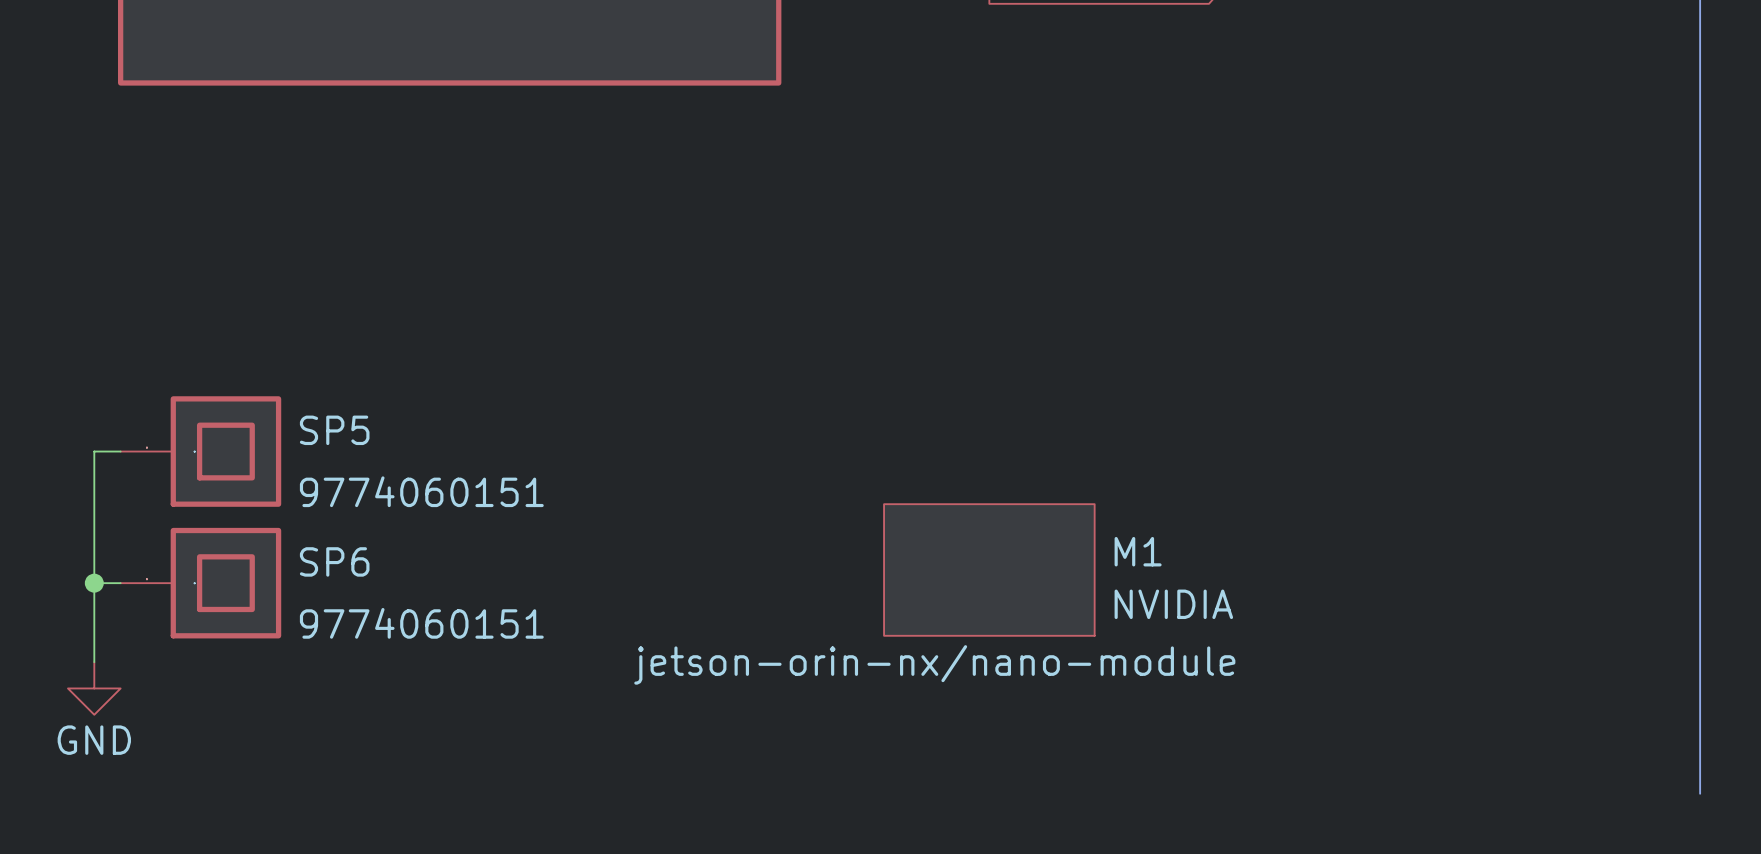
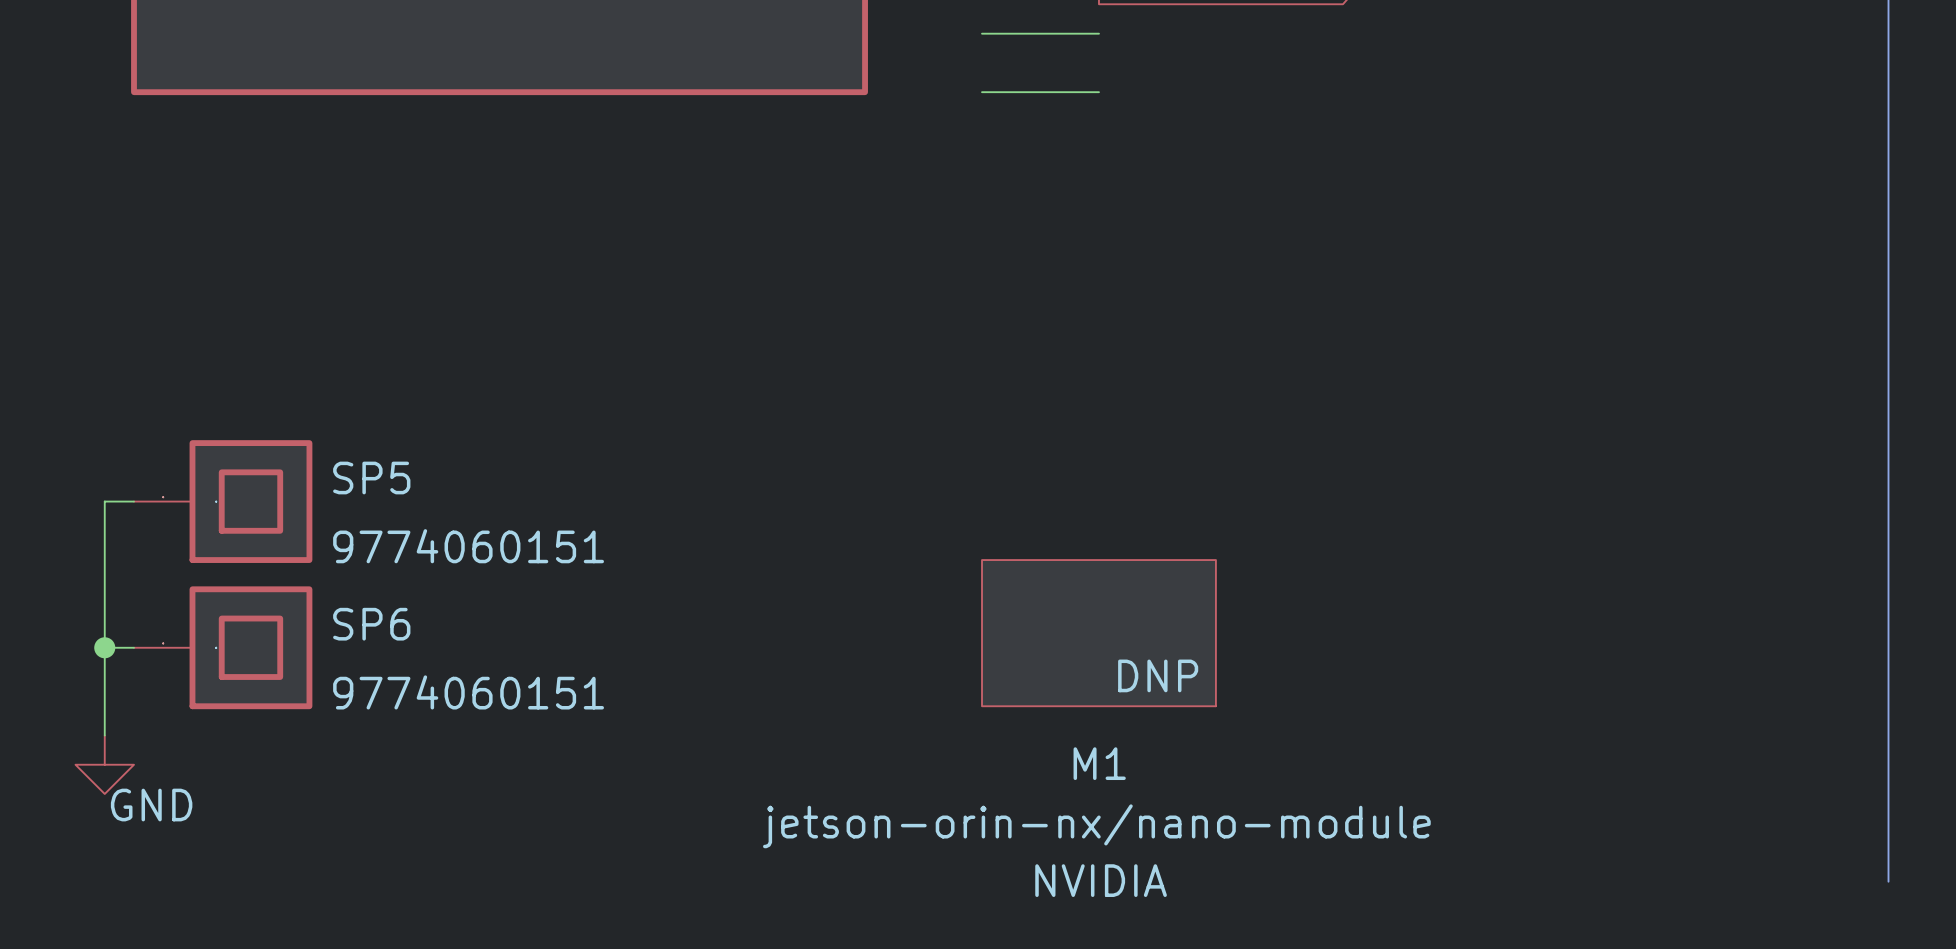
wire: none -> (982, 33) (1098, 33)
wire: none -> (982, 92) (1098, 92)
M1 name position: M1 (1138, 551) -> M1 (1099, 763)
M1 text position: NVIDIA (1173, 604) -> NVIDIA (1101, 880)
M1 text: none -> DNP (1158, 675)
M1 value position: jetson-orin-nx/nano-module (934, 664) -> jetson-orin-nx/nano-module (1096, 826)
power symbol text position: GND (94, 740) -> GND (151, 805)

